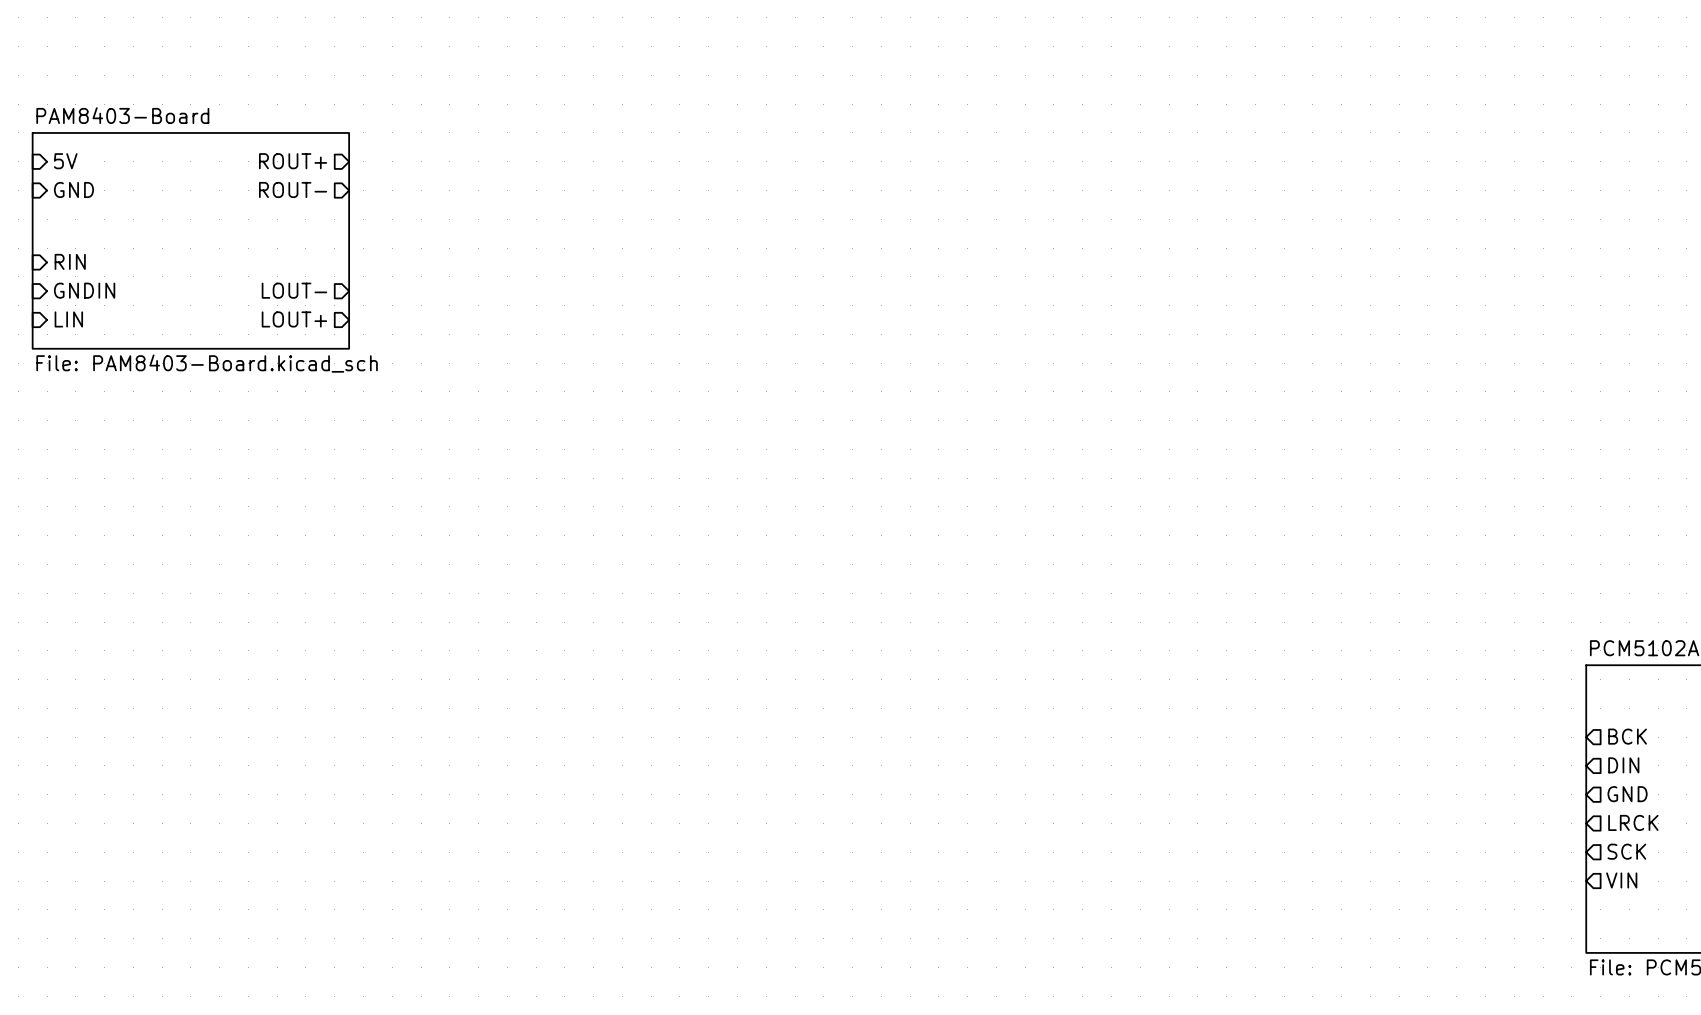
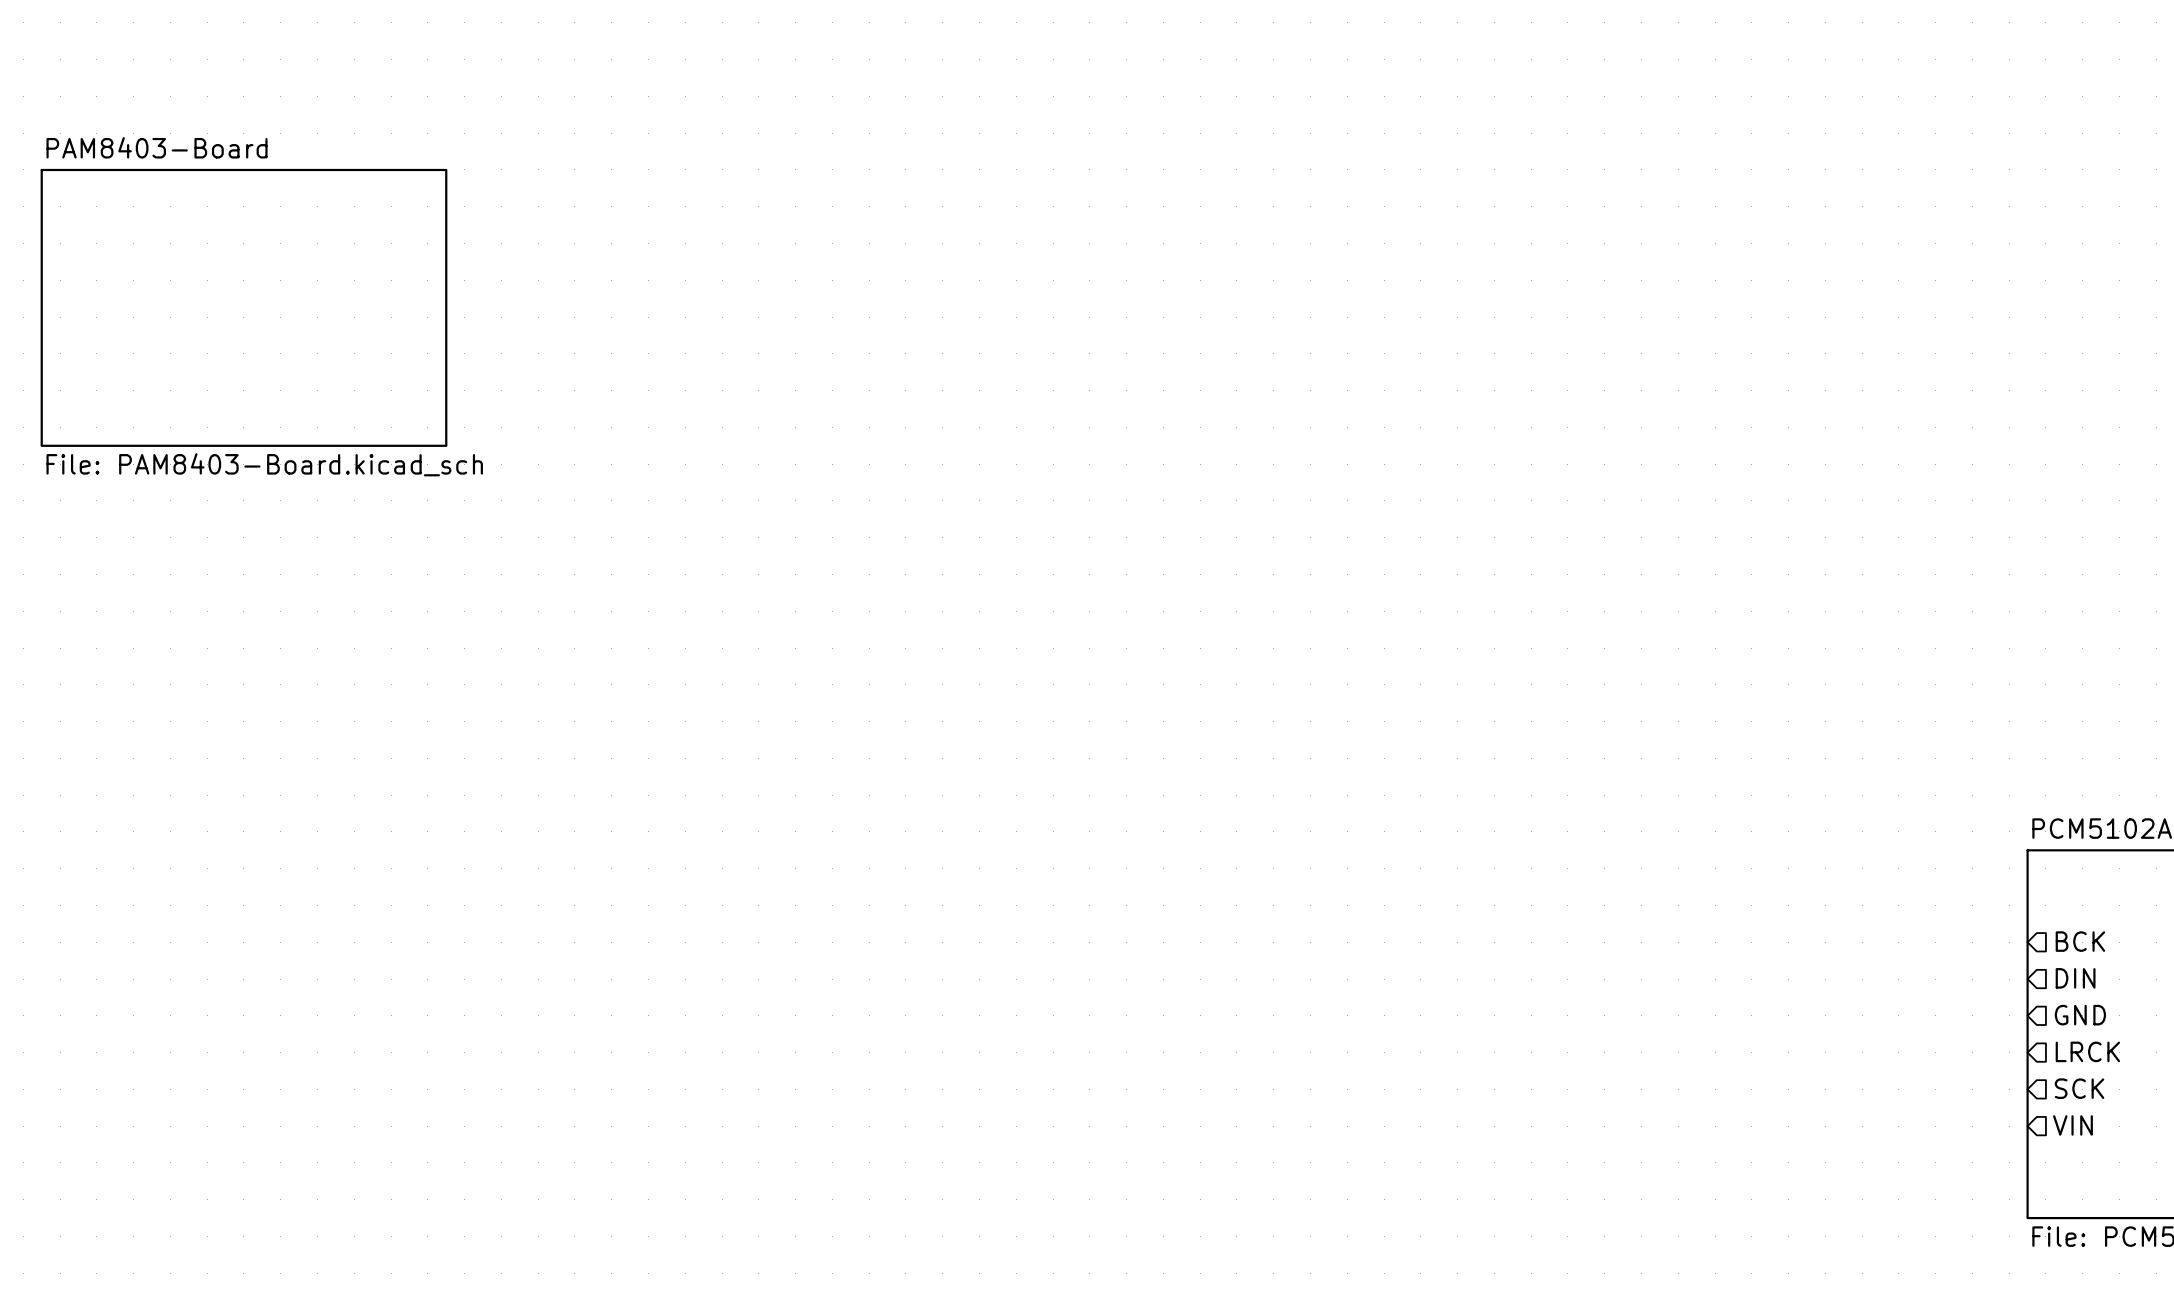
sheet pin: 5V (65, 161) -> none
sheet pin: ROUT+ (293, 161) -> none
sheet pin: GND (73, 189) -> none
sheet pin: ROUT- (293, 189) -> none
sheet pin: RIN (70, 261) -> none
sheet pin: GNDIN (84, 290) -> none
sheet pin: LOUT- (294, 290) -> none
sheet pin: LIN (68, 319) -> none
sheet pin: LOUT+ (294, 319) -> none

